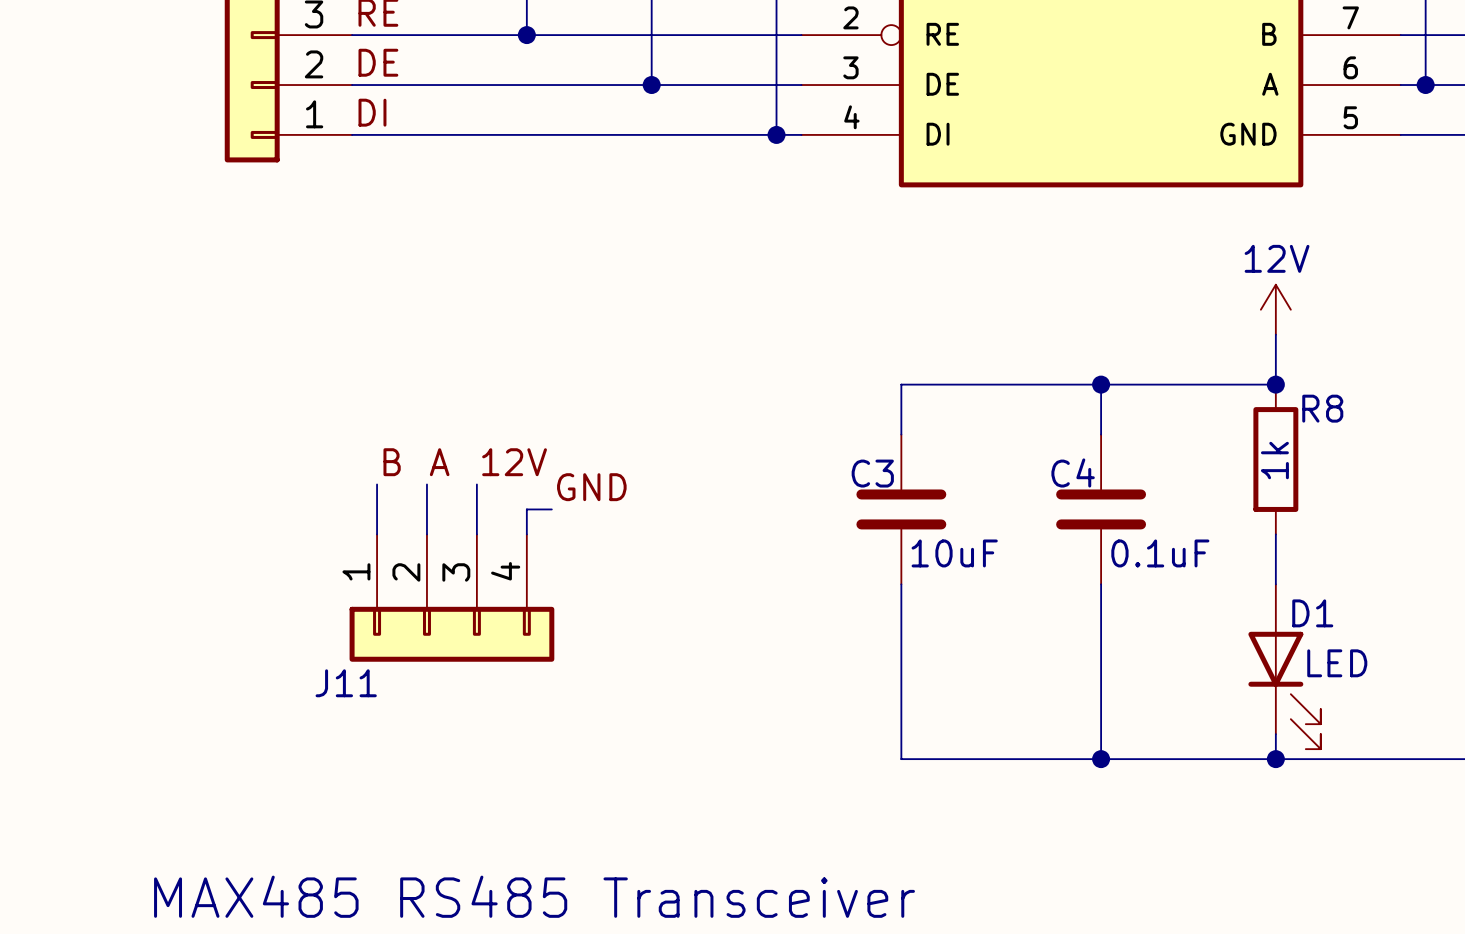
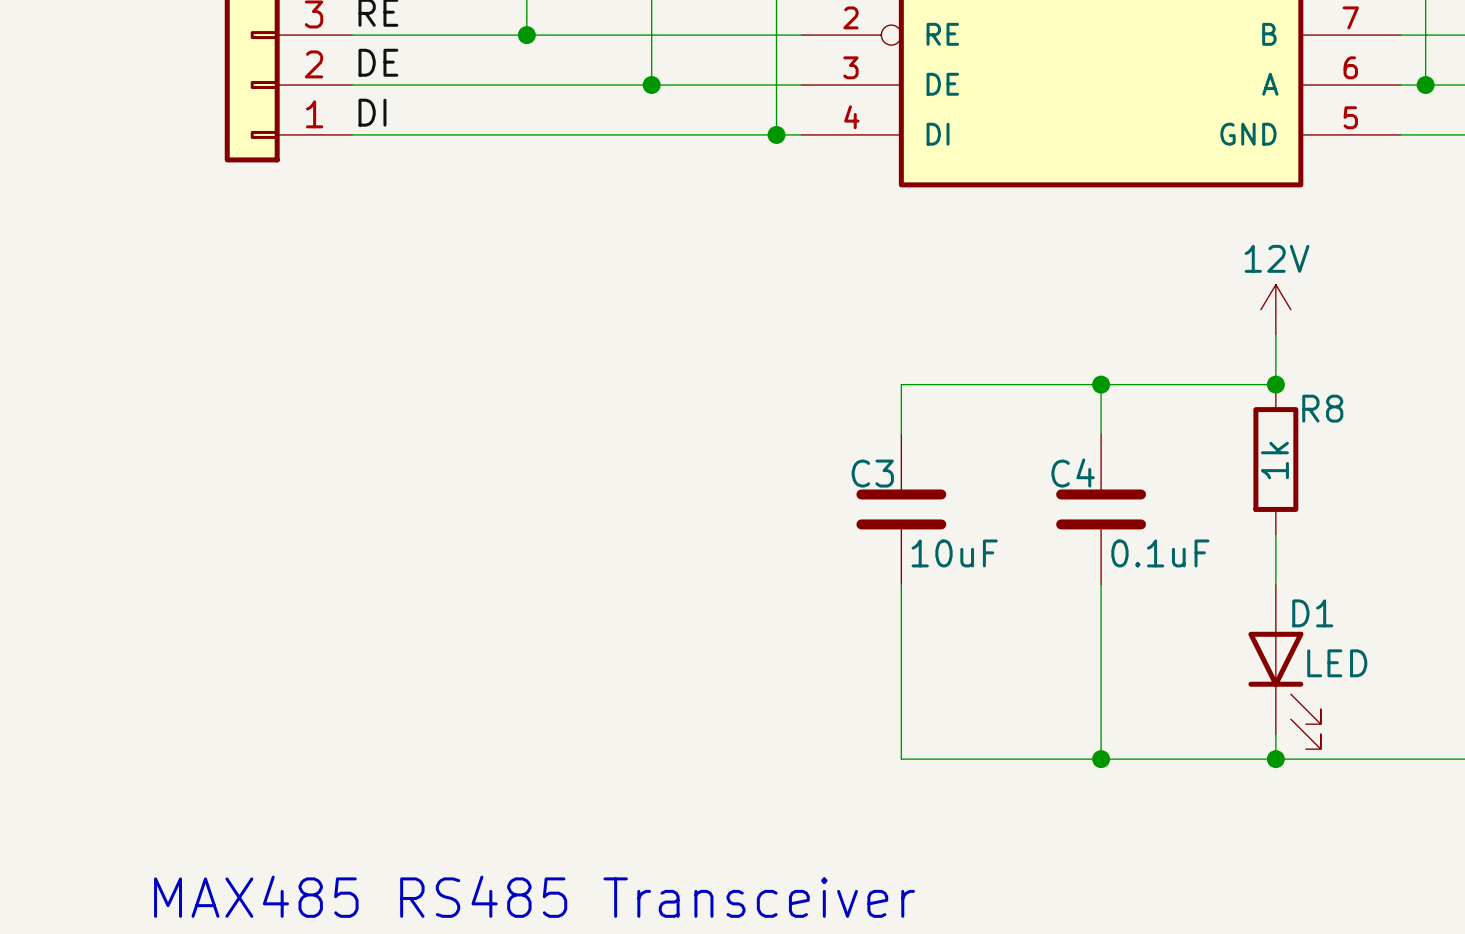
label: B (392, 462) -> none
label: A (439, 462) -> none
label: 12V (514, 462) -> none
wire: (377, 484) (377, 534) -> none
wire: (426, 484) (426, 534) -> none
wire: (476, 484) (476, 534) -> none
label: GND (591, 487) -> none
wire: (551, 509) (526, 509) (526, 534) -> none
J11: (451, 598) -> none

